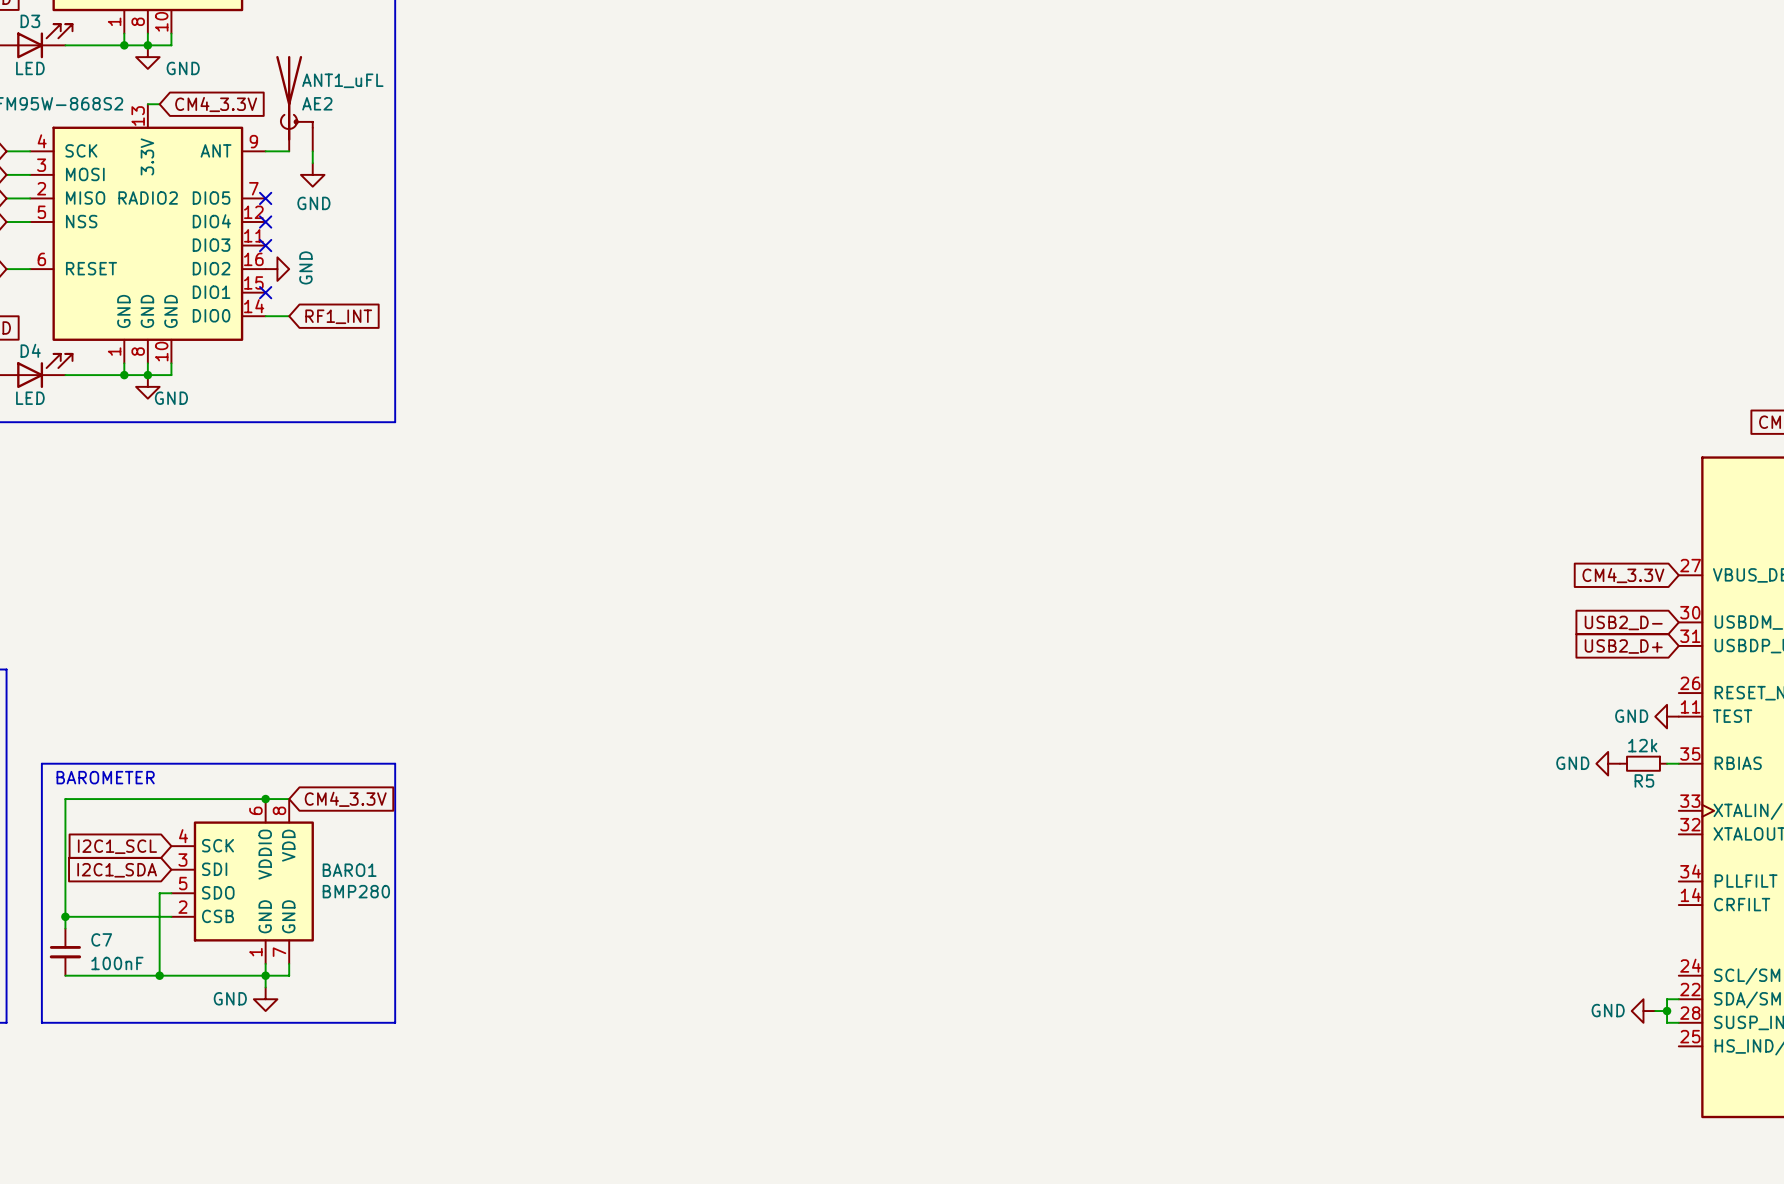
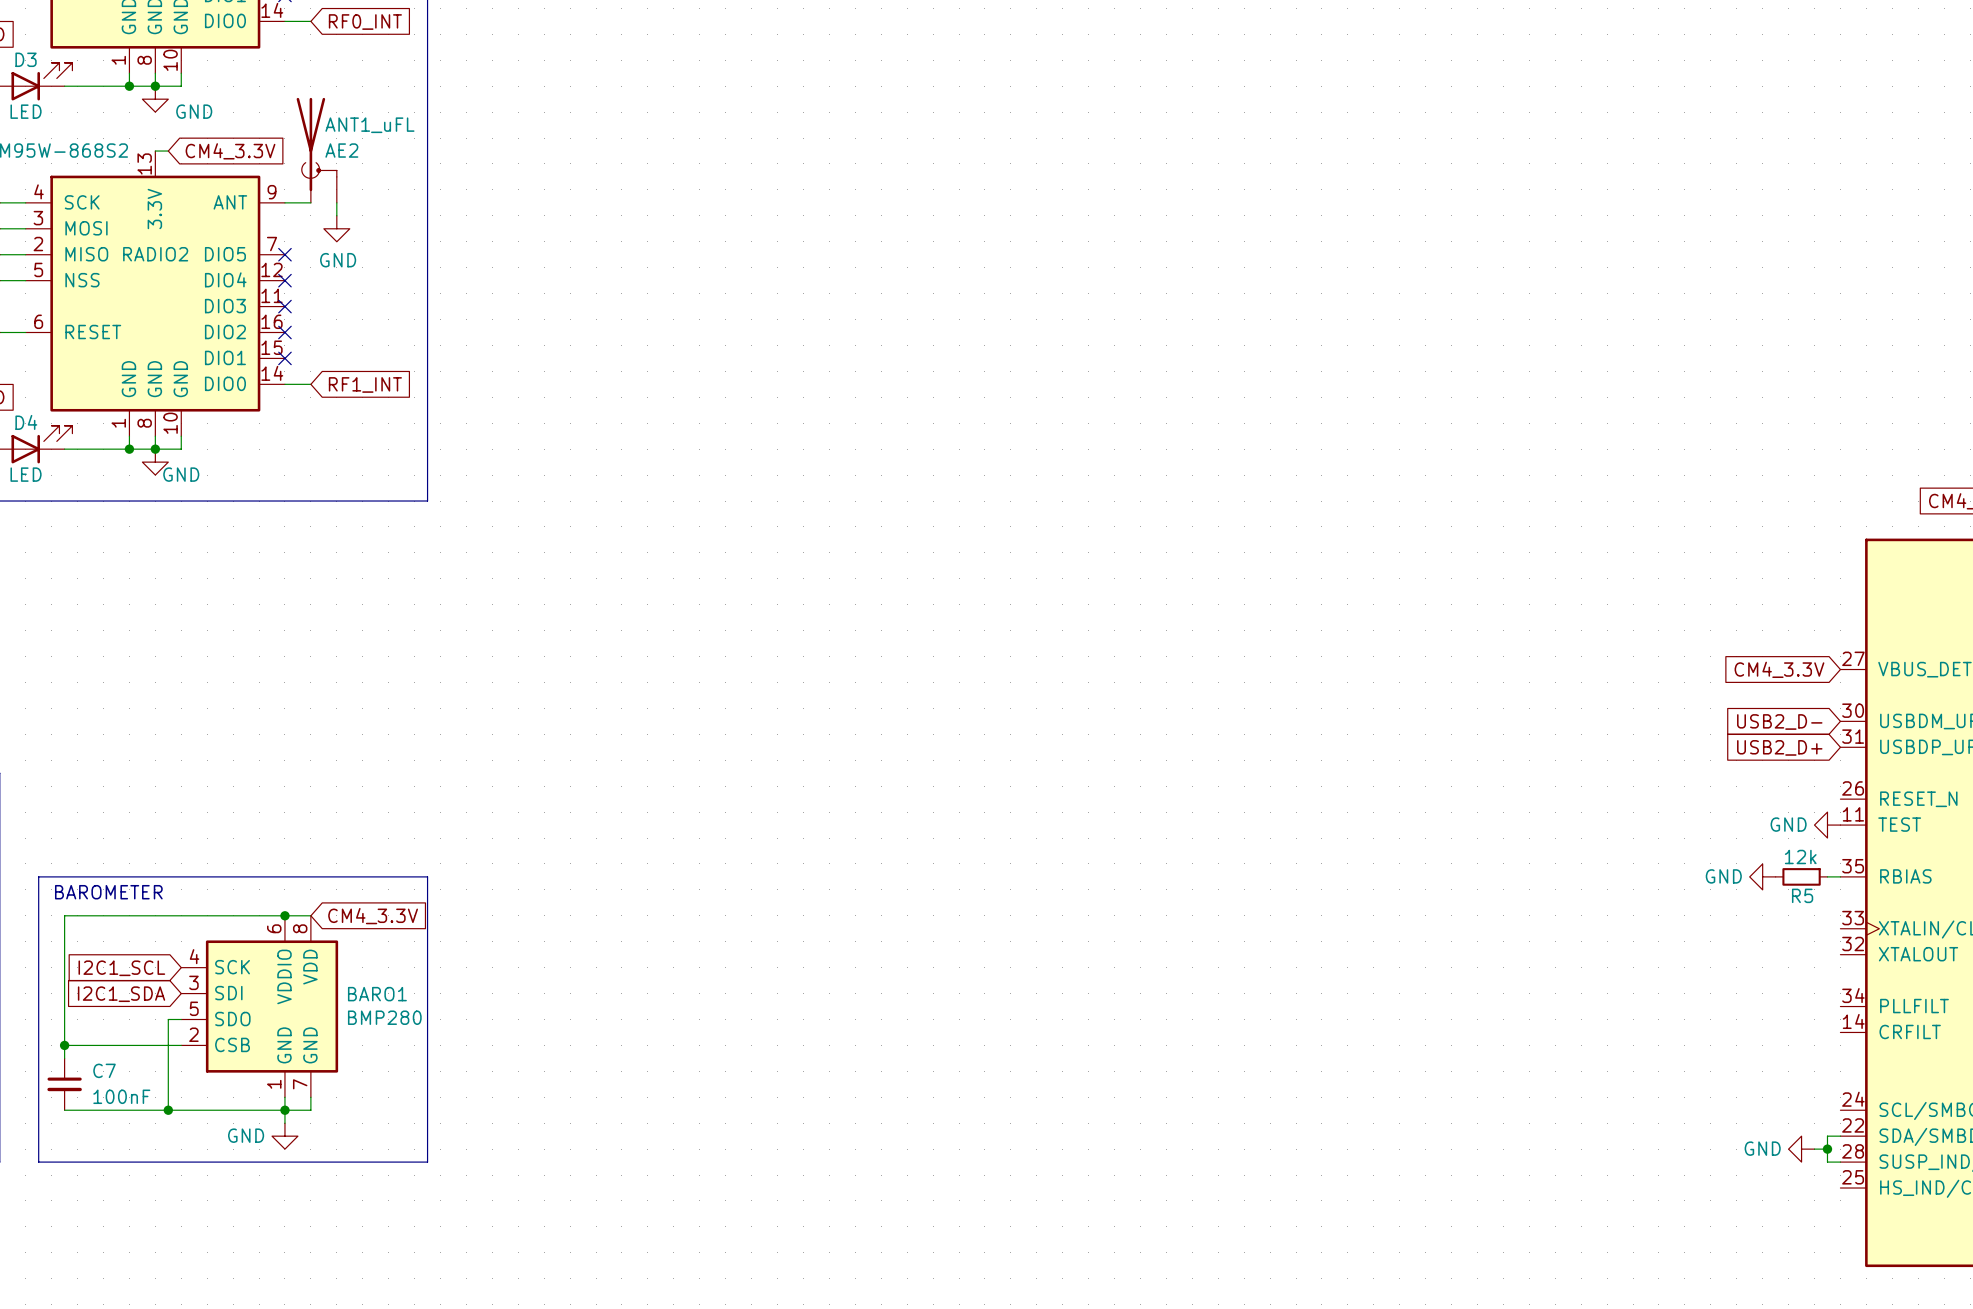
no-connect mark: none -> (284, 332)
power symbol: GND (277, 269) -> none

